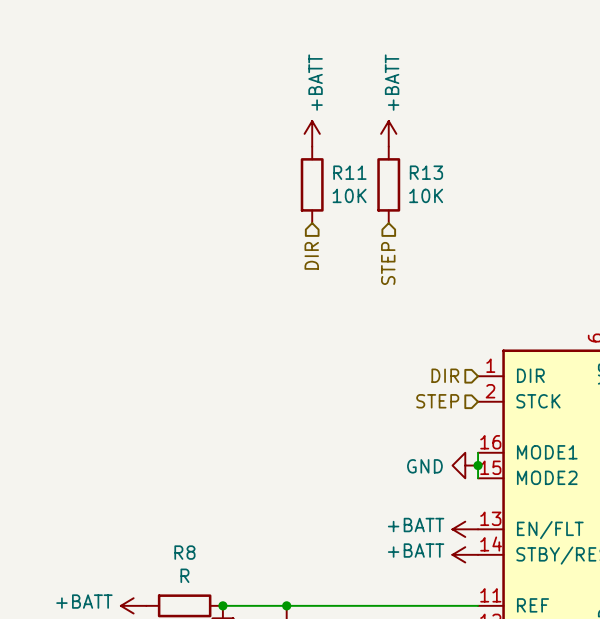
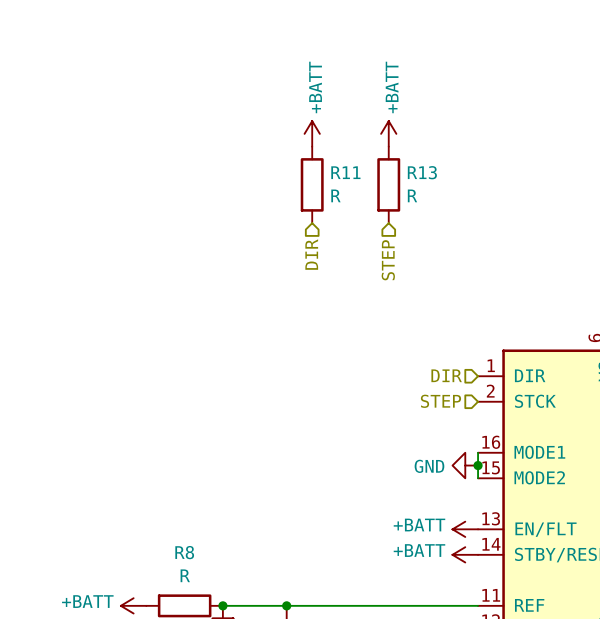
R11 value: 10K (349, 195) -> R (335, 195)
R13 value: 10K (426, 195) -> R (412, 195)

